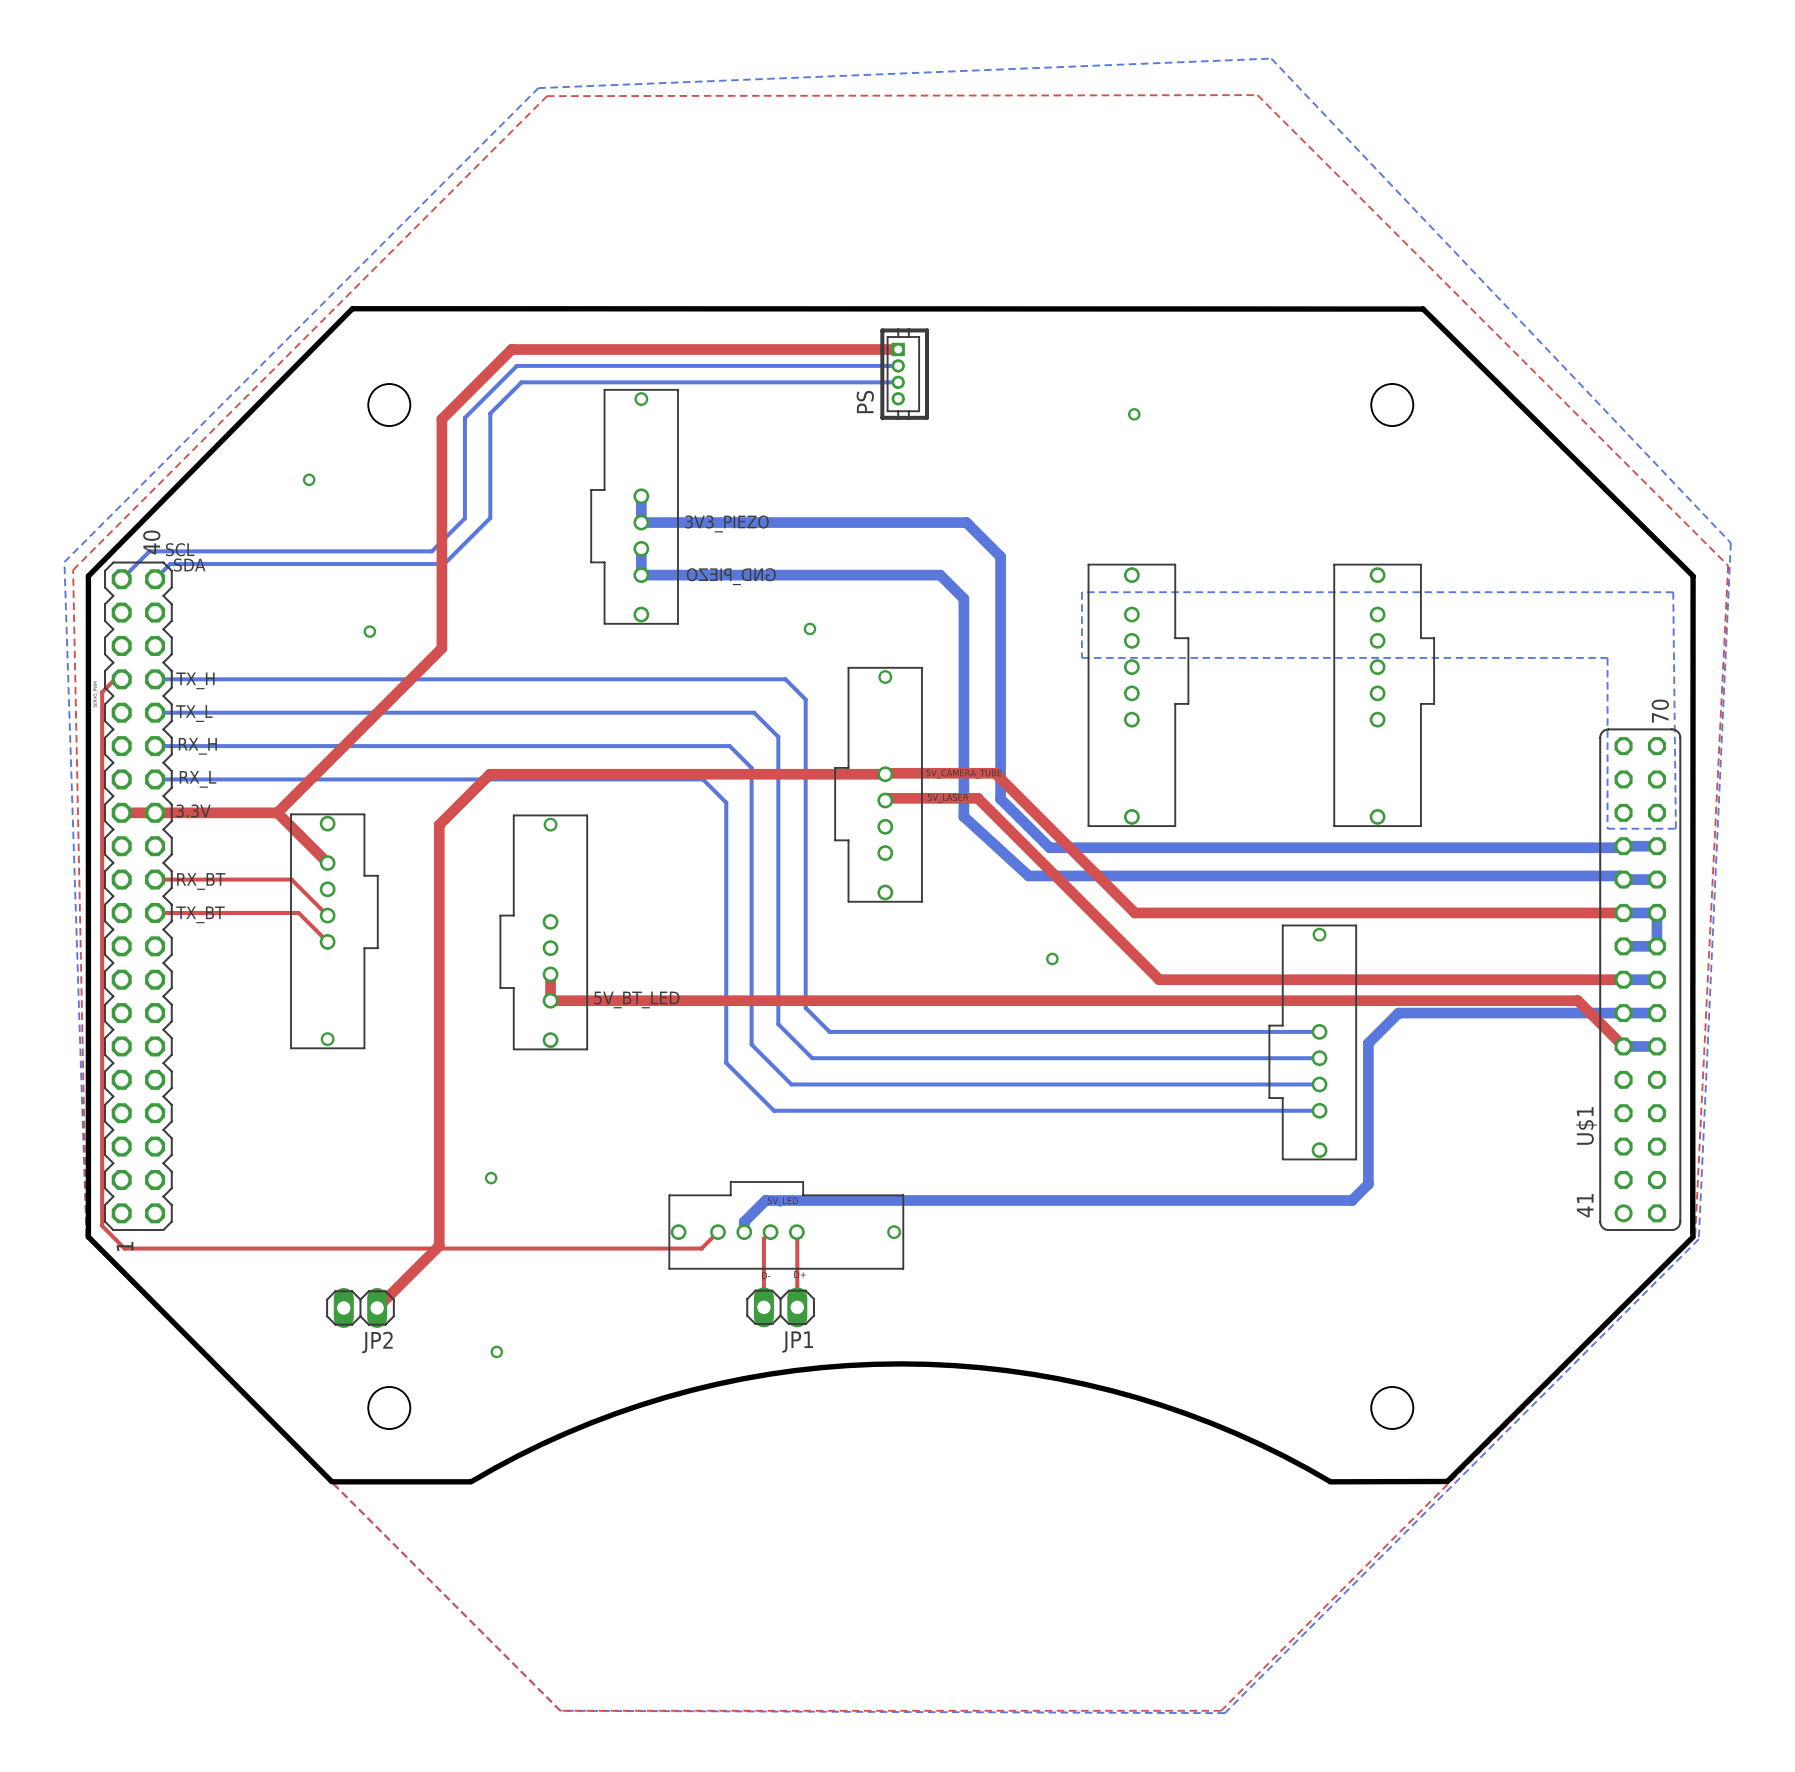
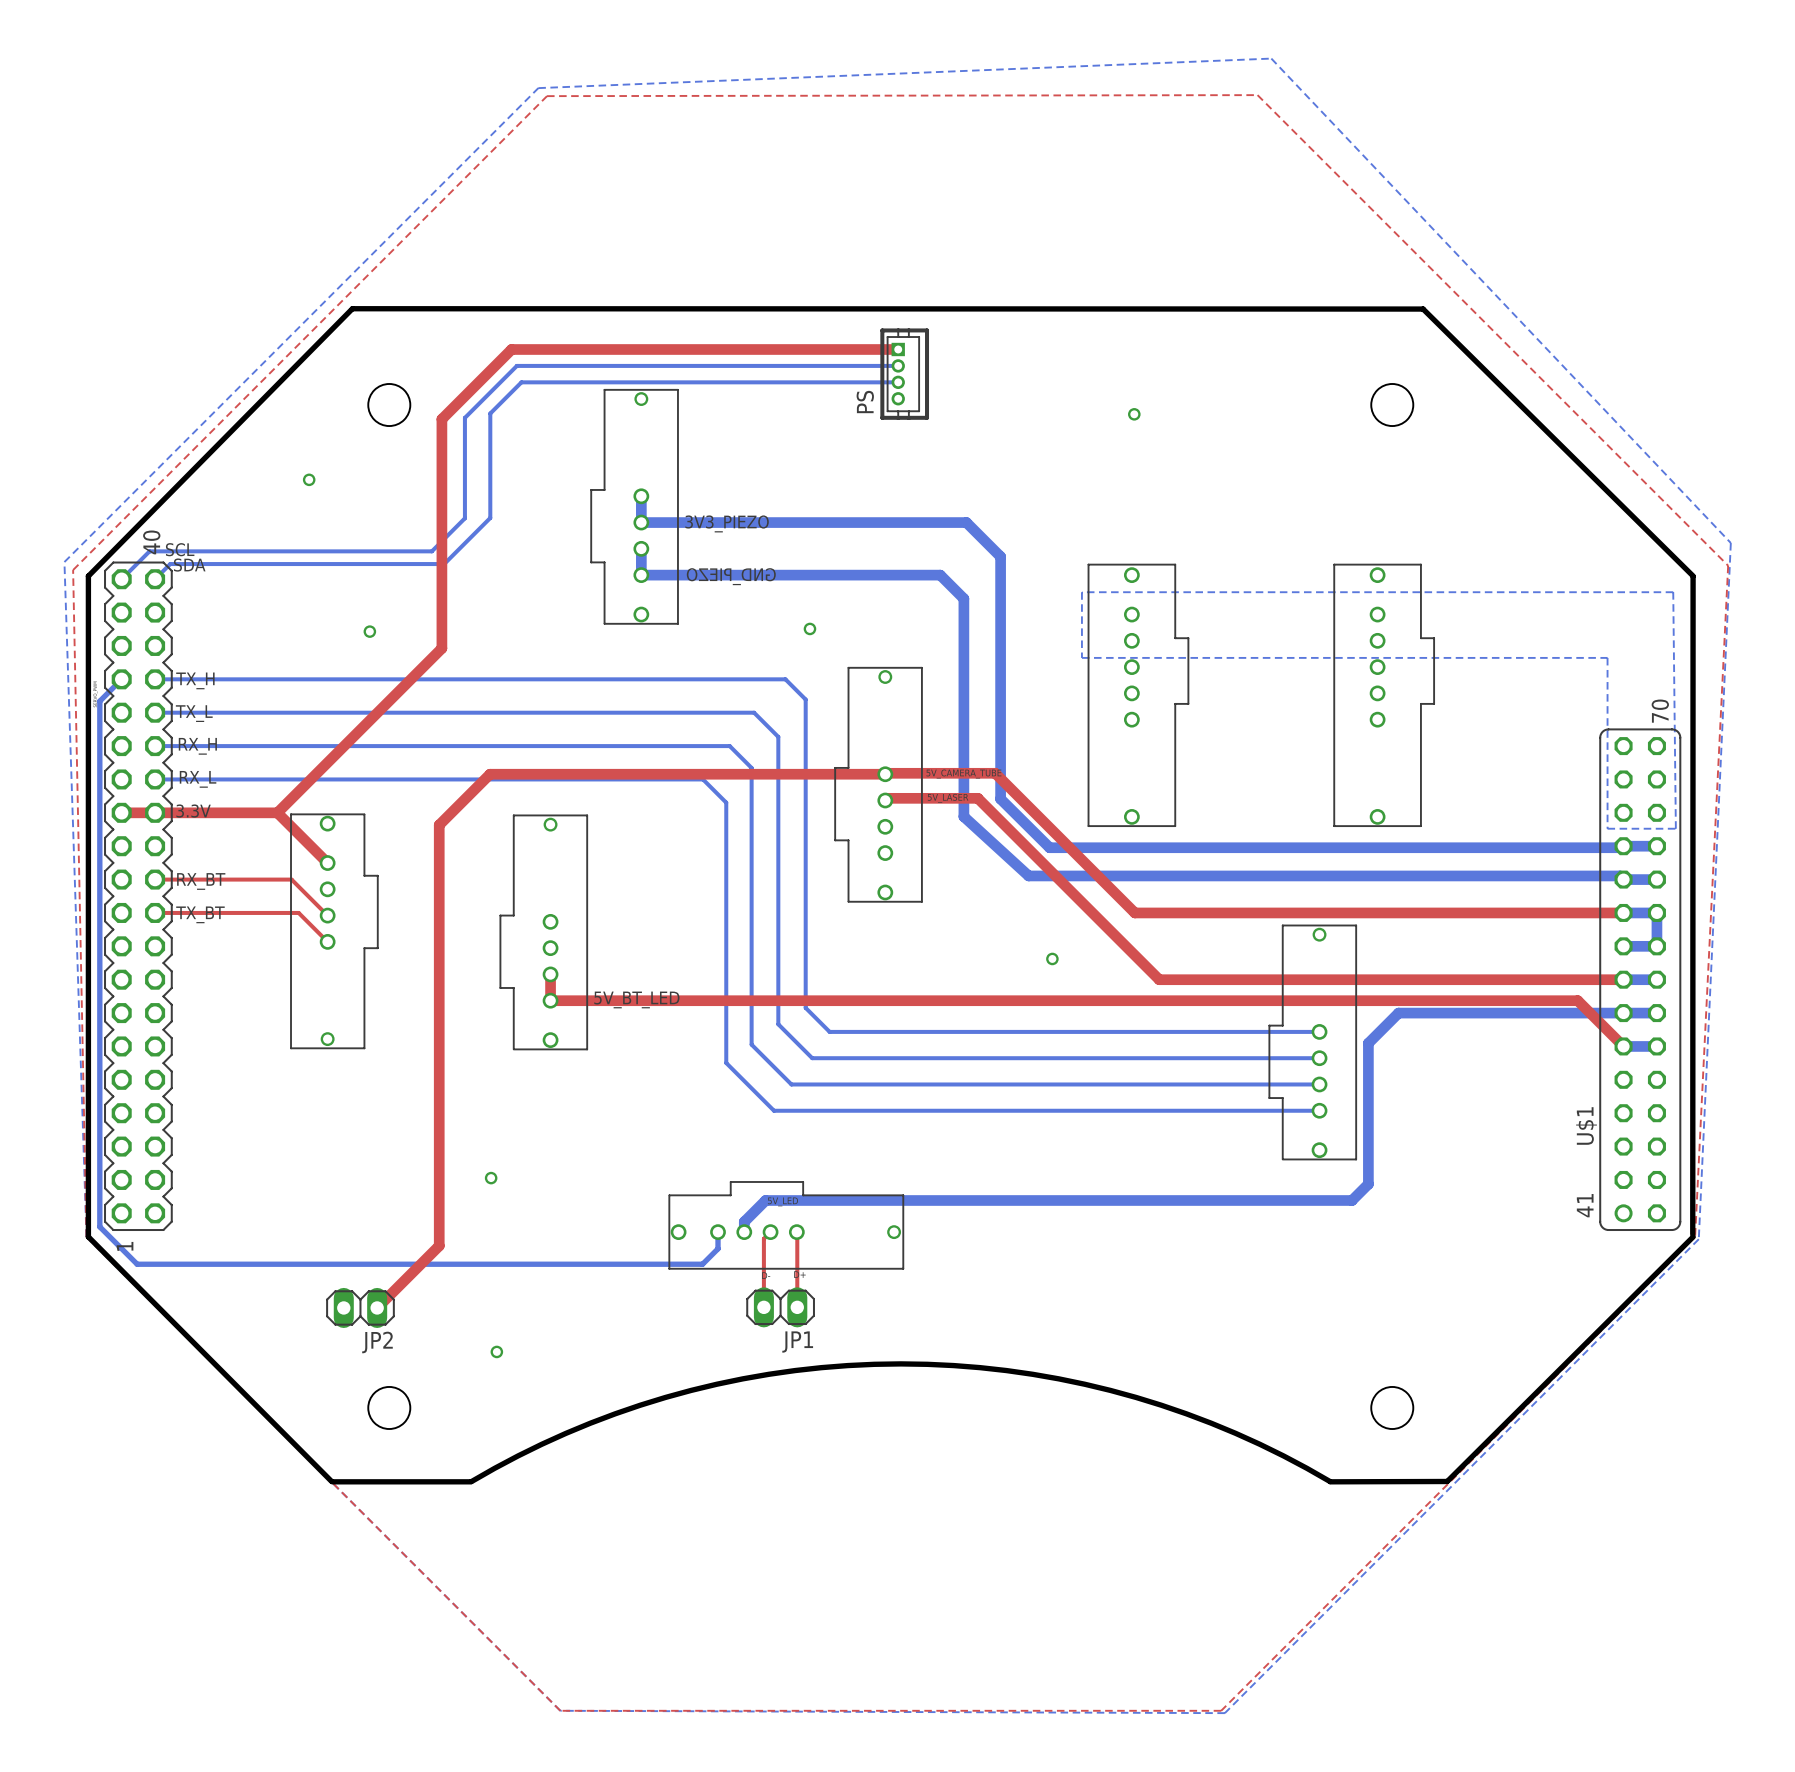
top track: (121, 679) (115, 679) (102, 692) (102, 1225) (124, 1248) (701, 1248) (718, 1232) -> none
bottom track: none -> (121, 679) (99, 701) (99, 1226) (137, 1264) (702, 1264) (718, 1248) (718, 1232)

